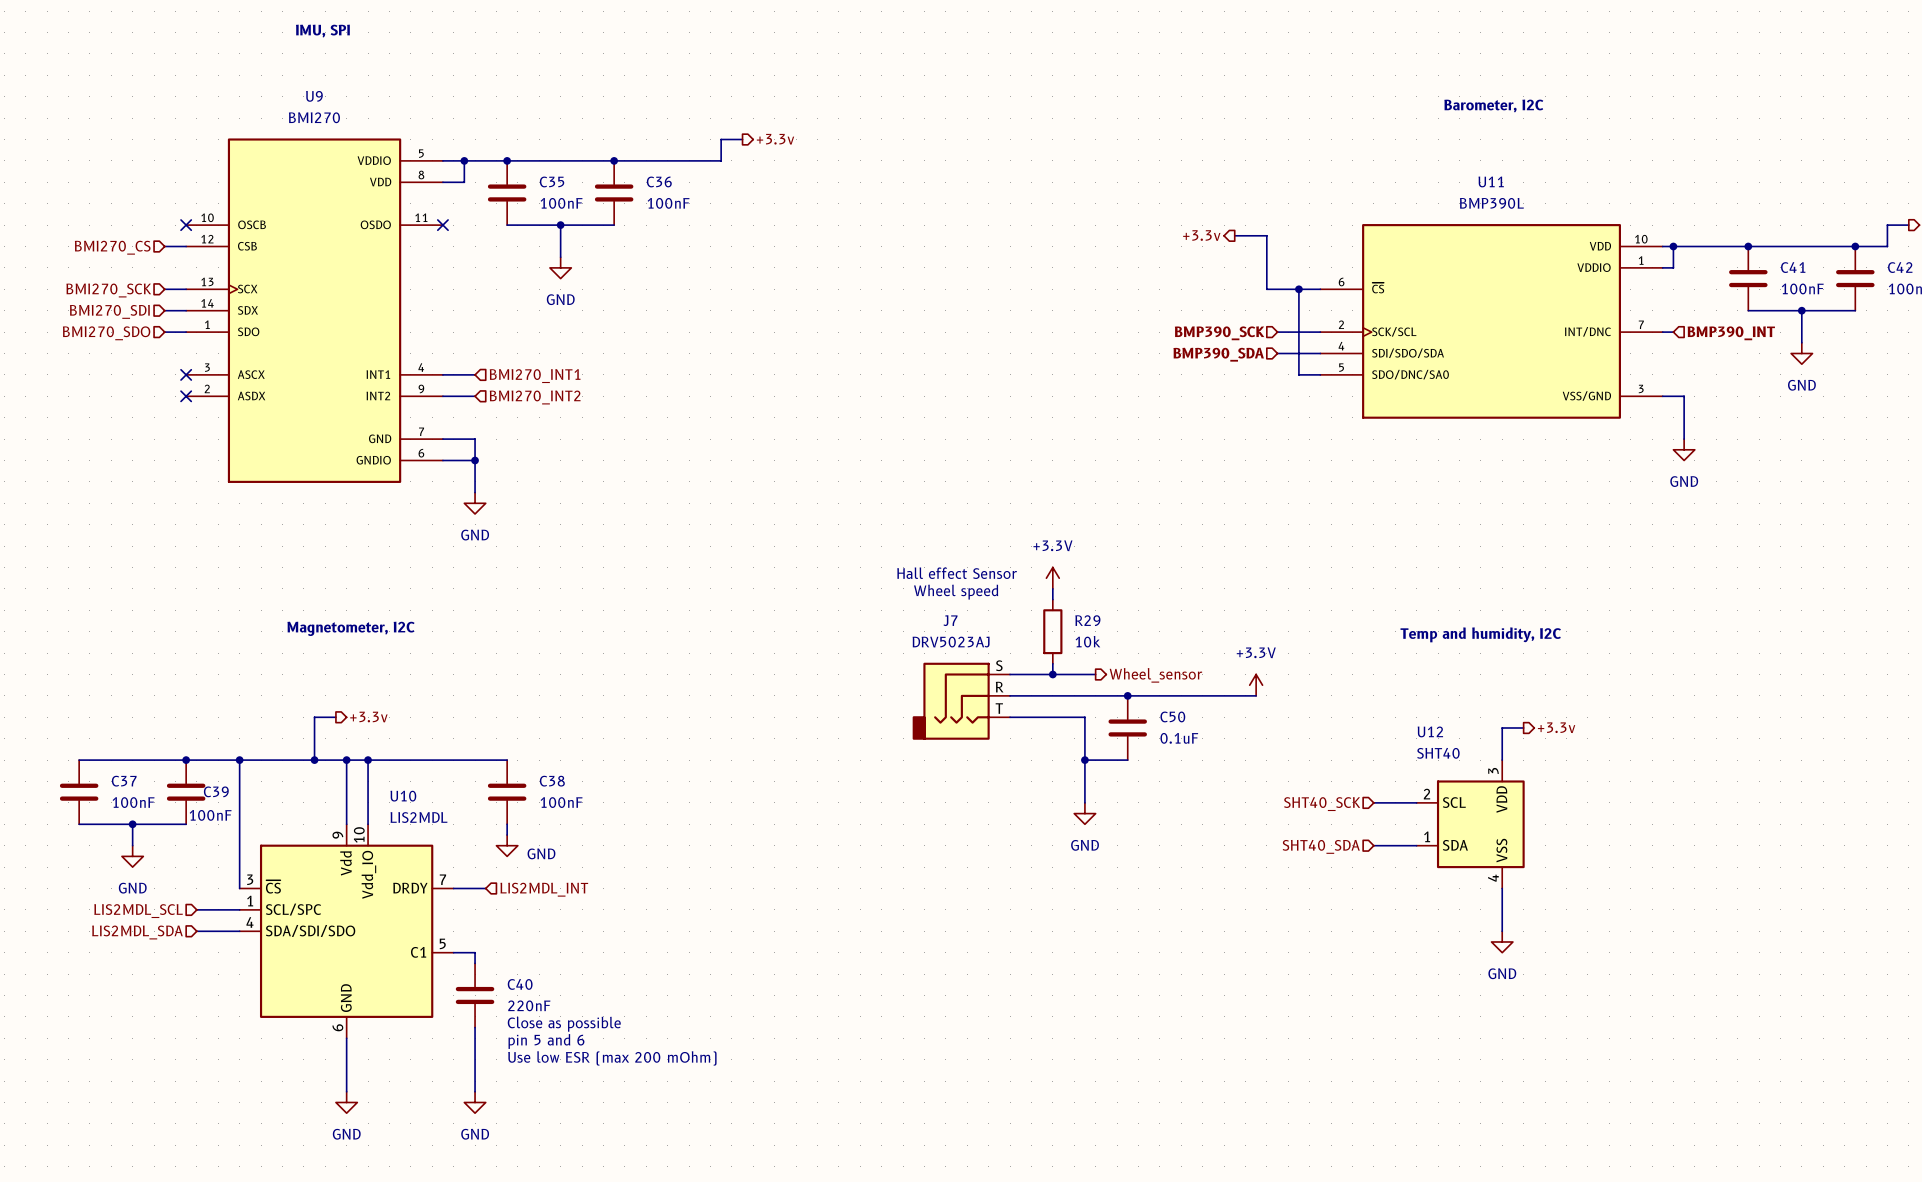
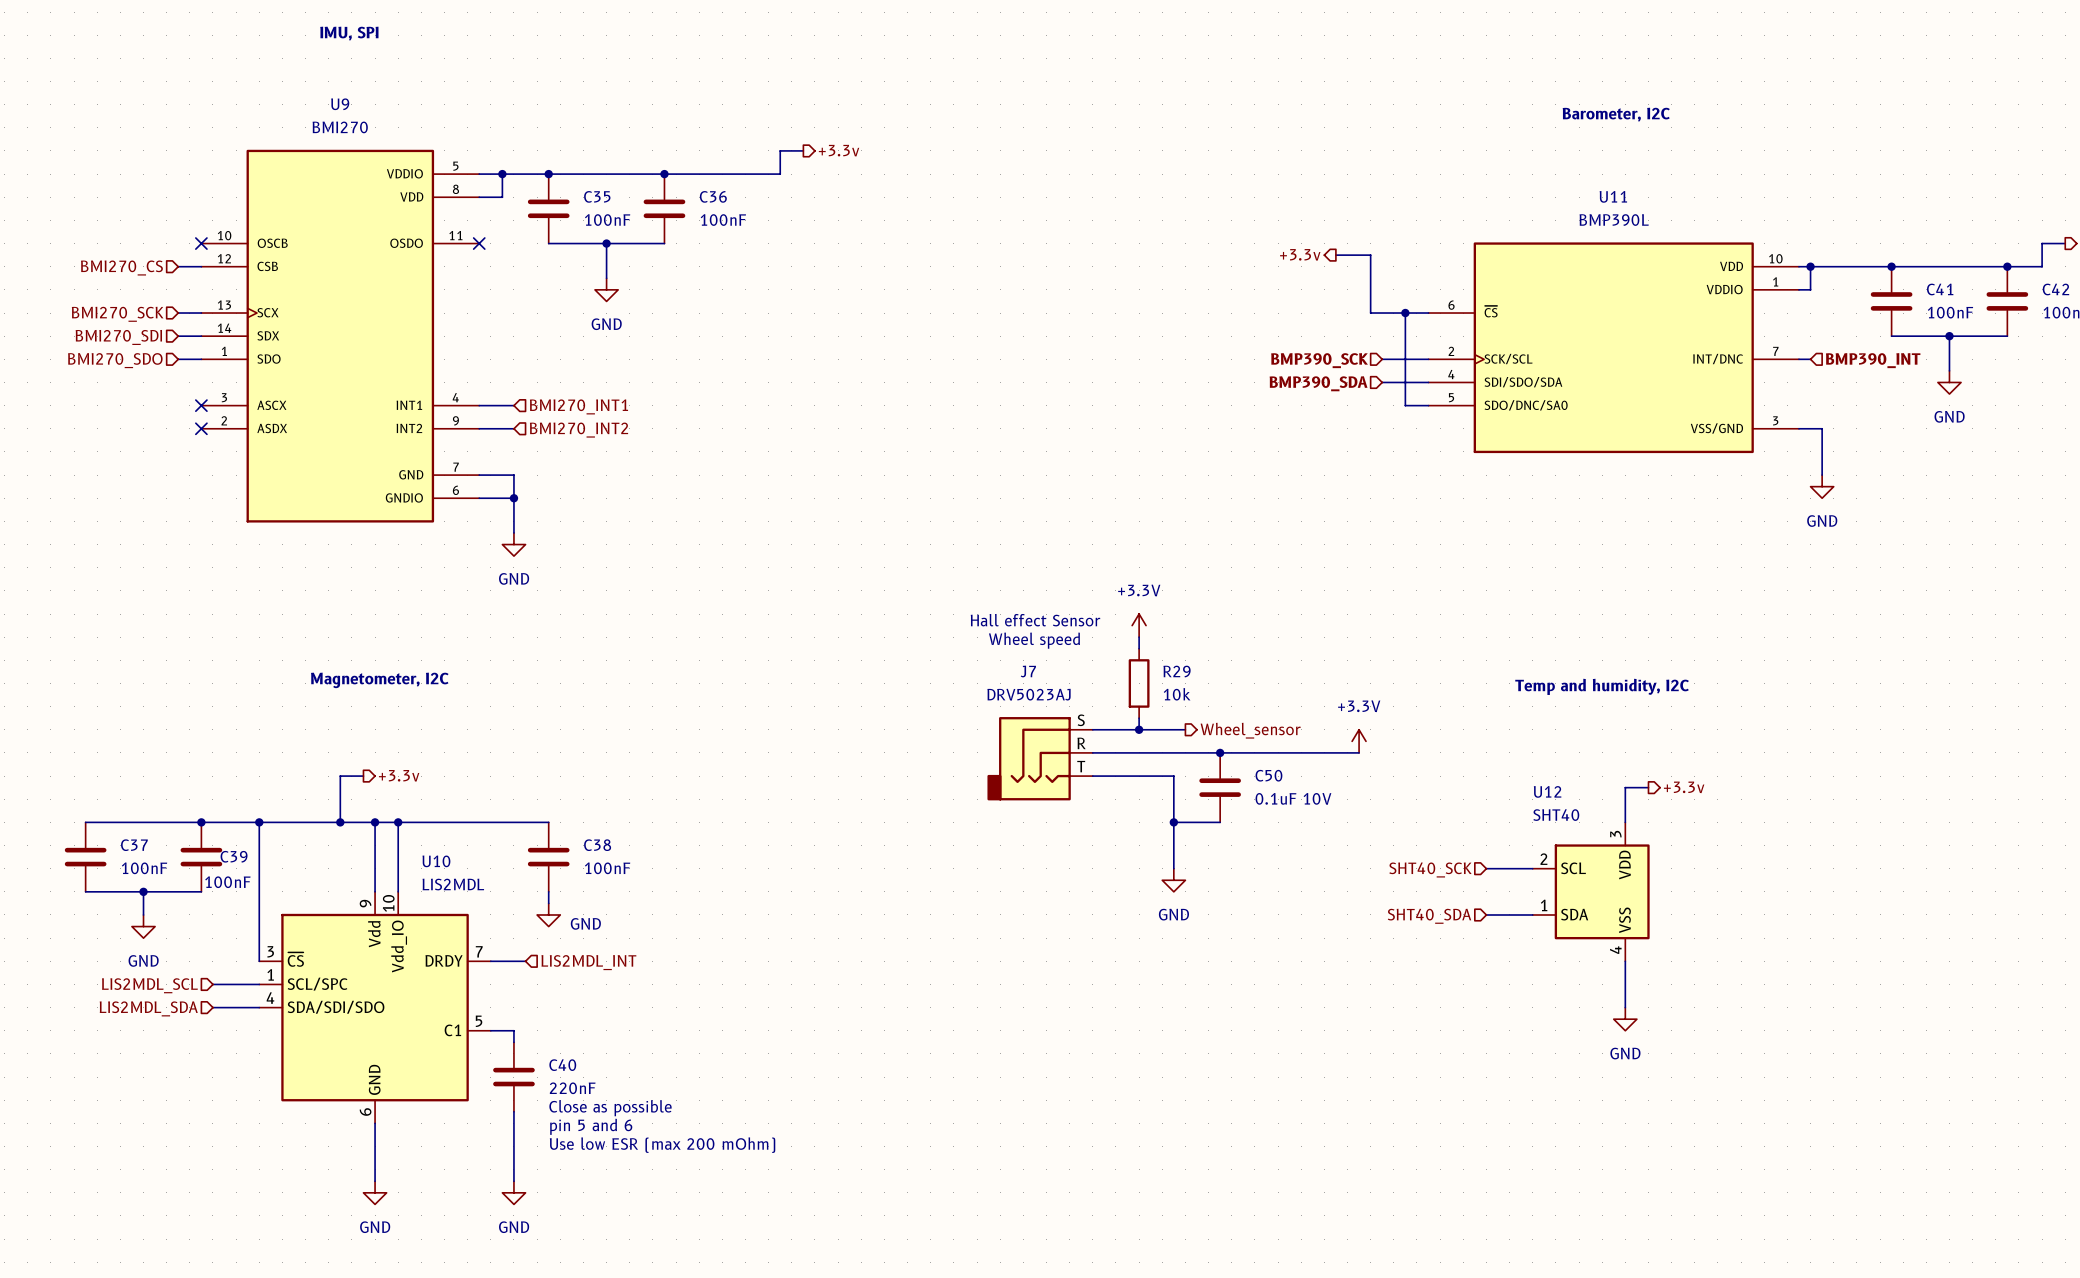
C50 value: 0.1uF (1179, 738) -> 0.1uF 10V (1293, 798)

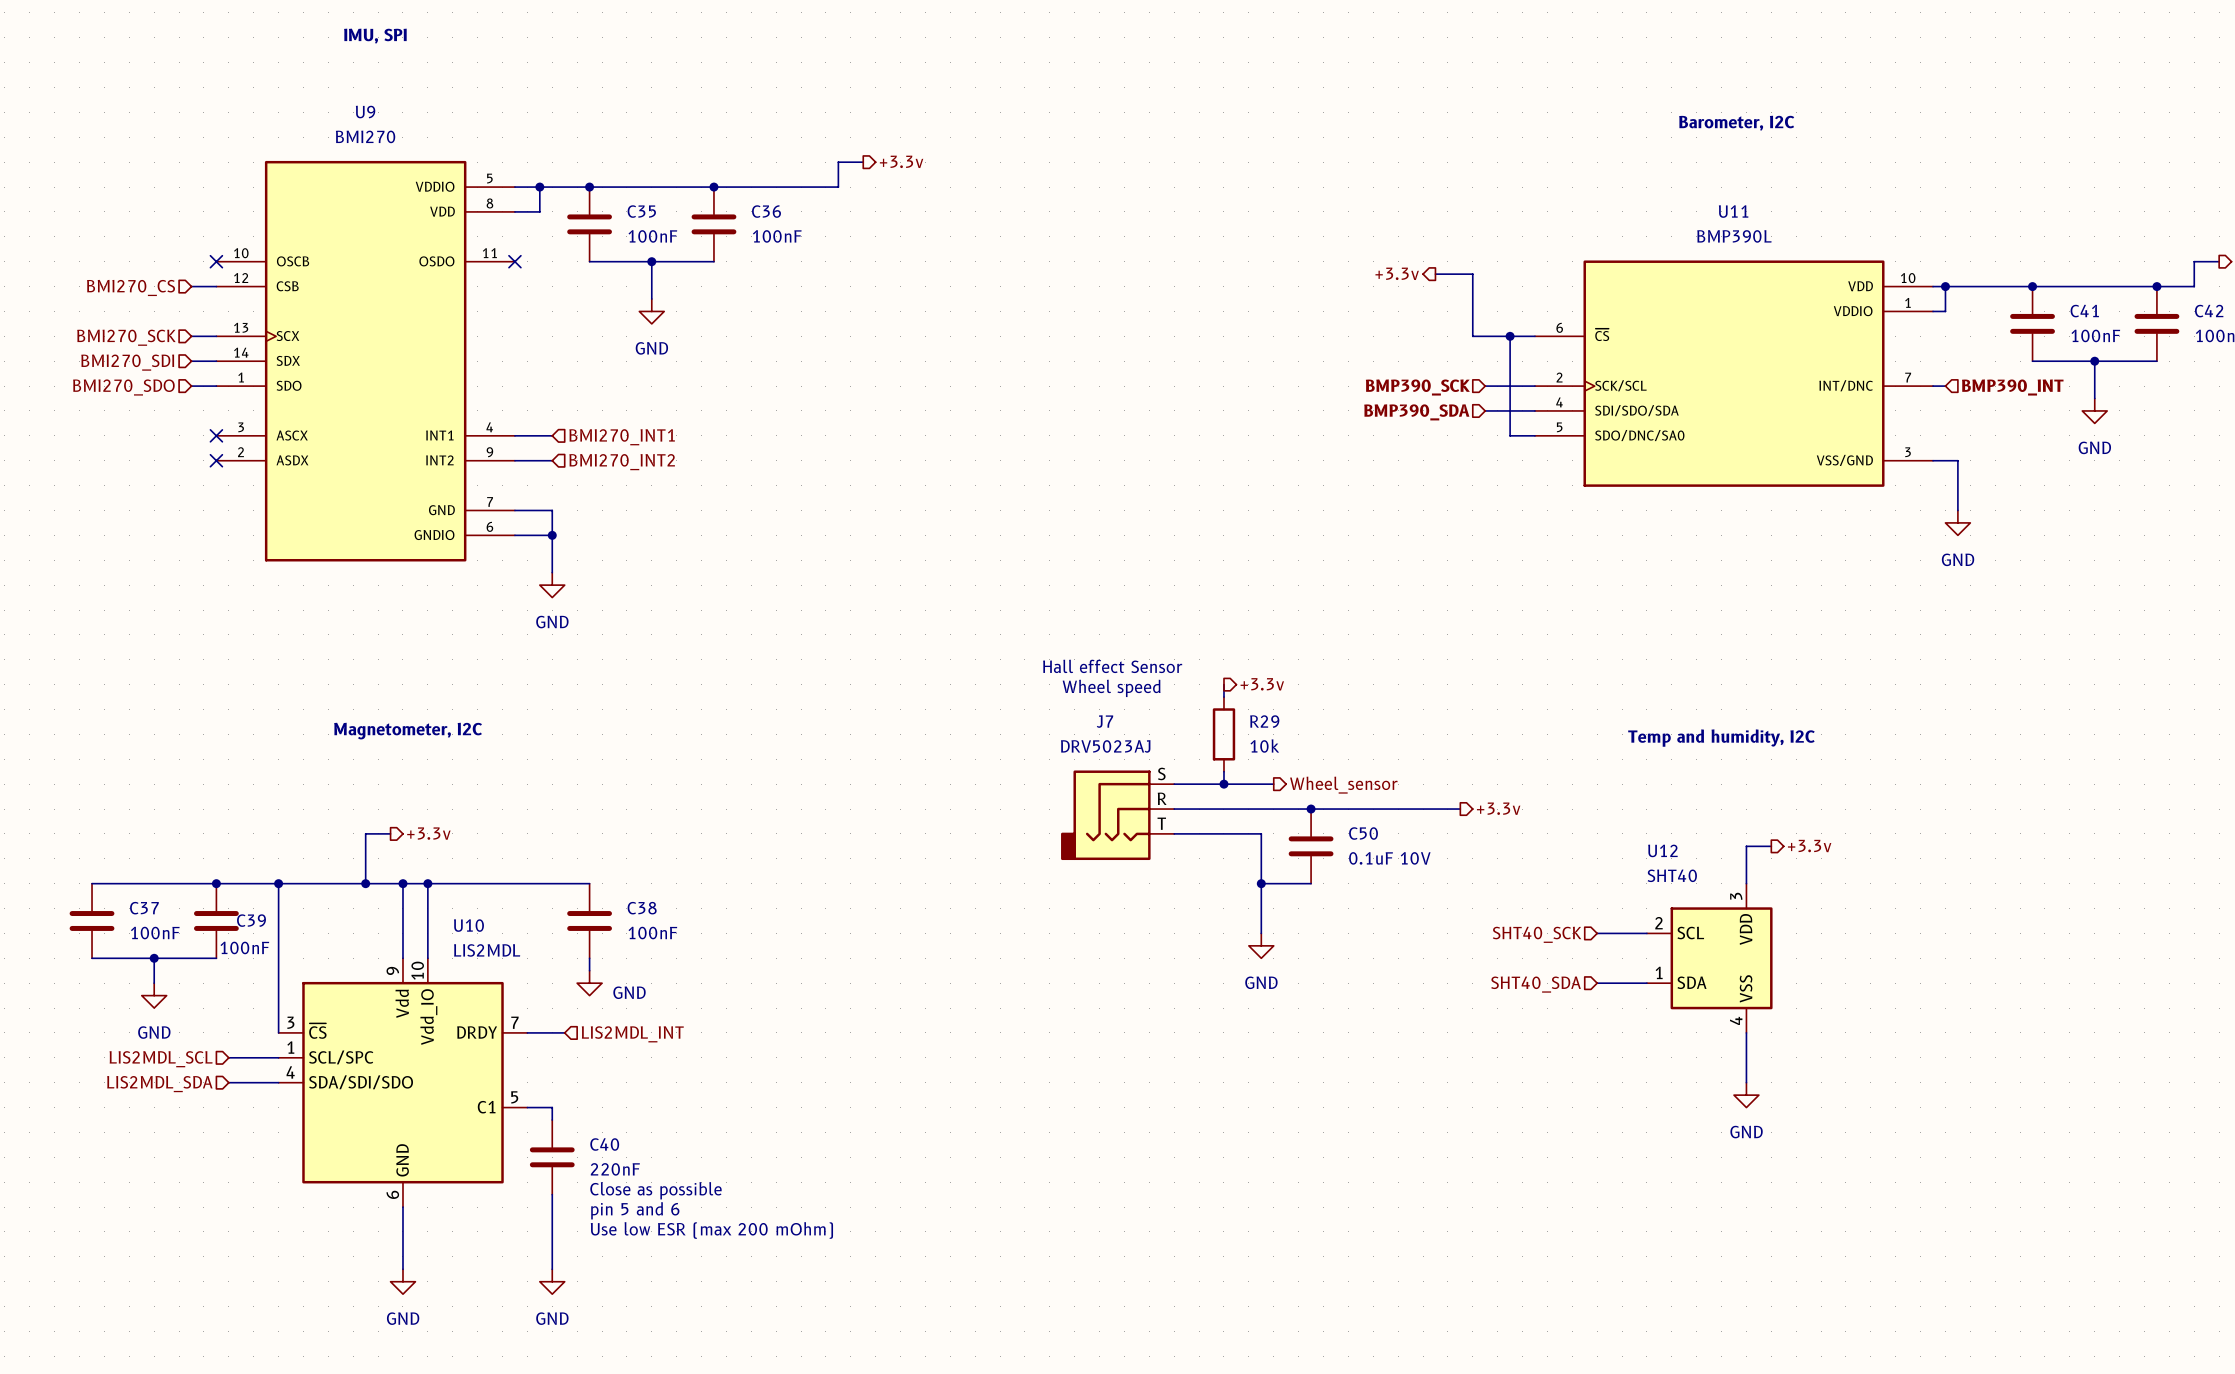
power symbol: +3.3V (1139, 625) -> none
hierarchical label: none -> +3.3v (1262, 684)
power symbol: +3.3V (1359, 741) -> none
hierarchical label: none -> +3.3v (1498, 808)

